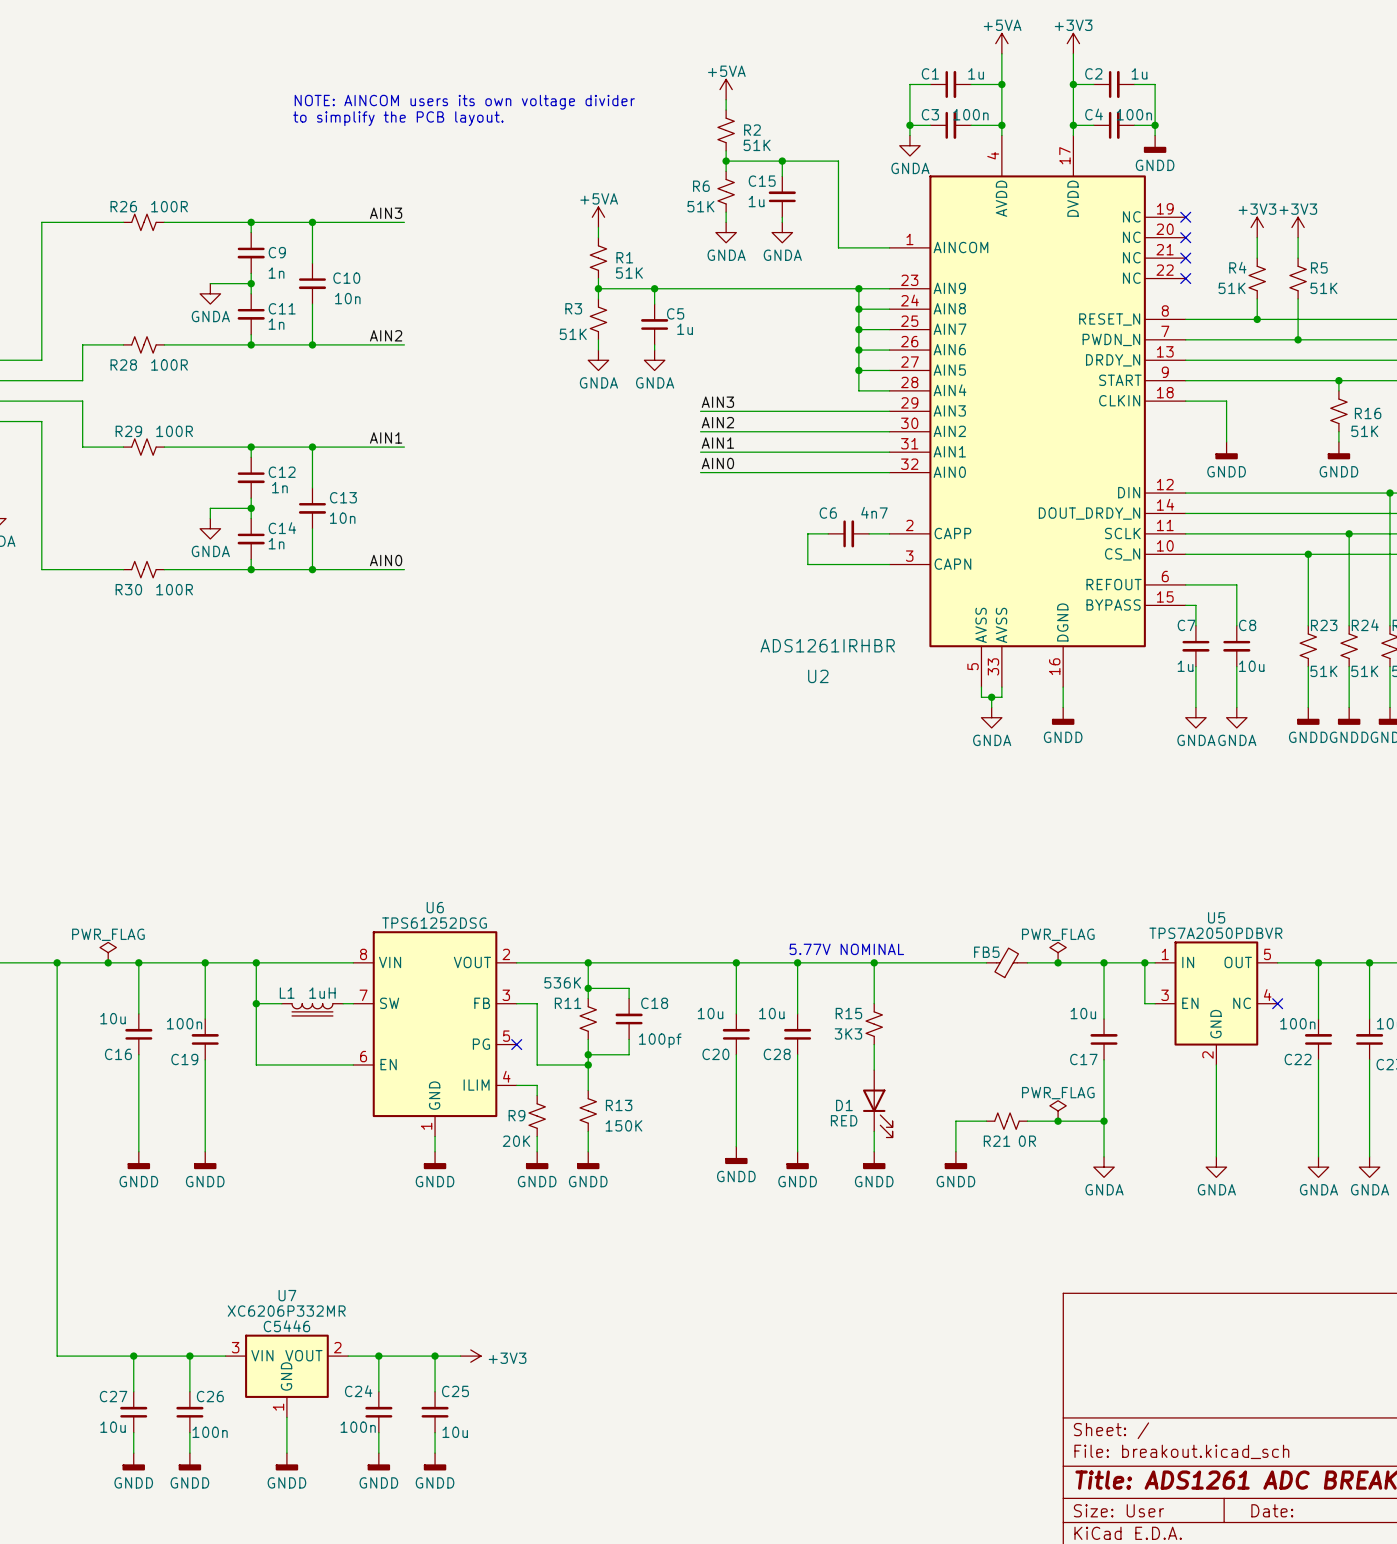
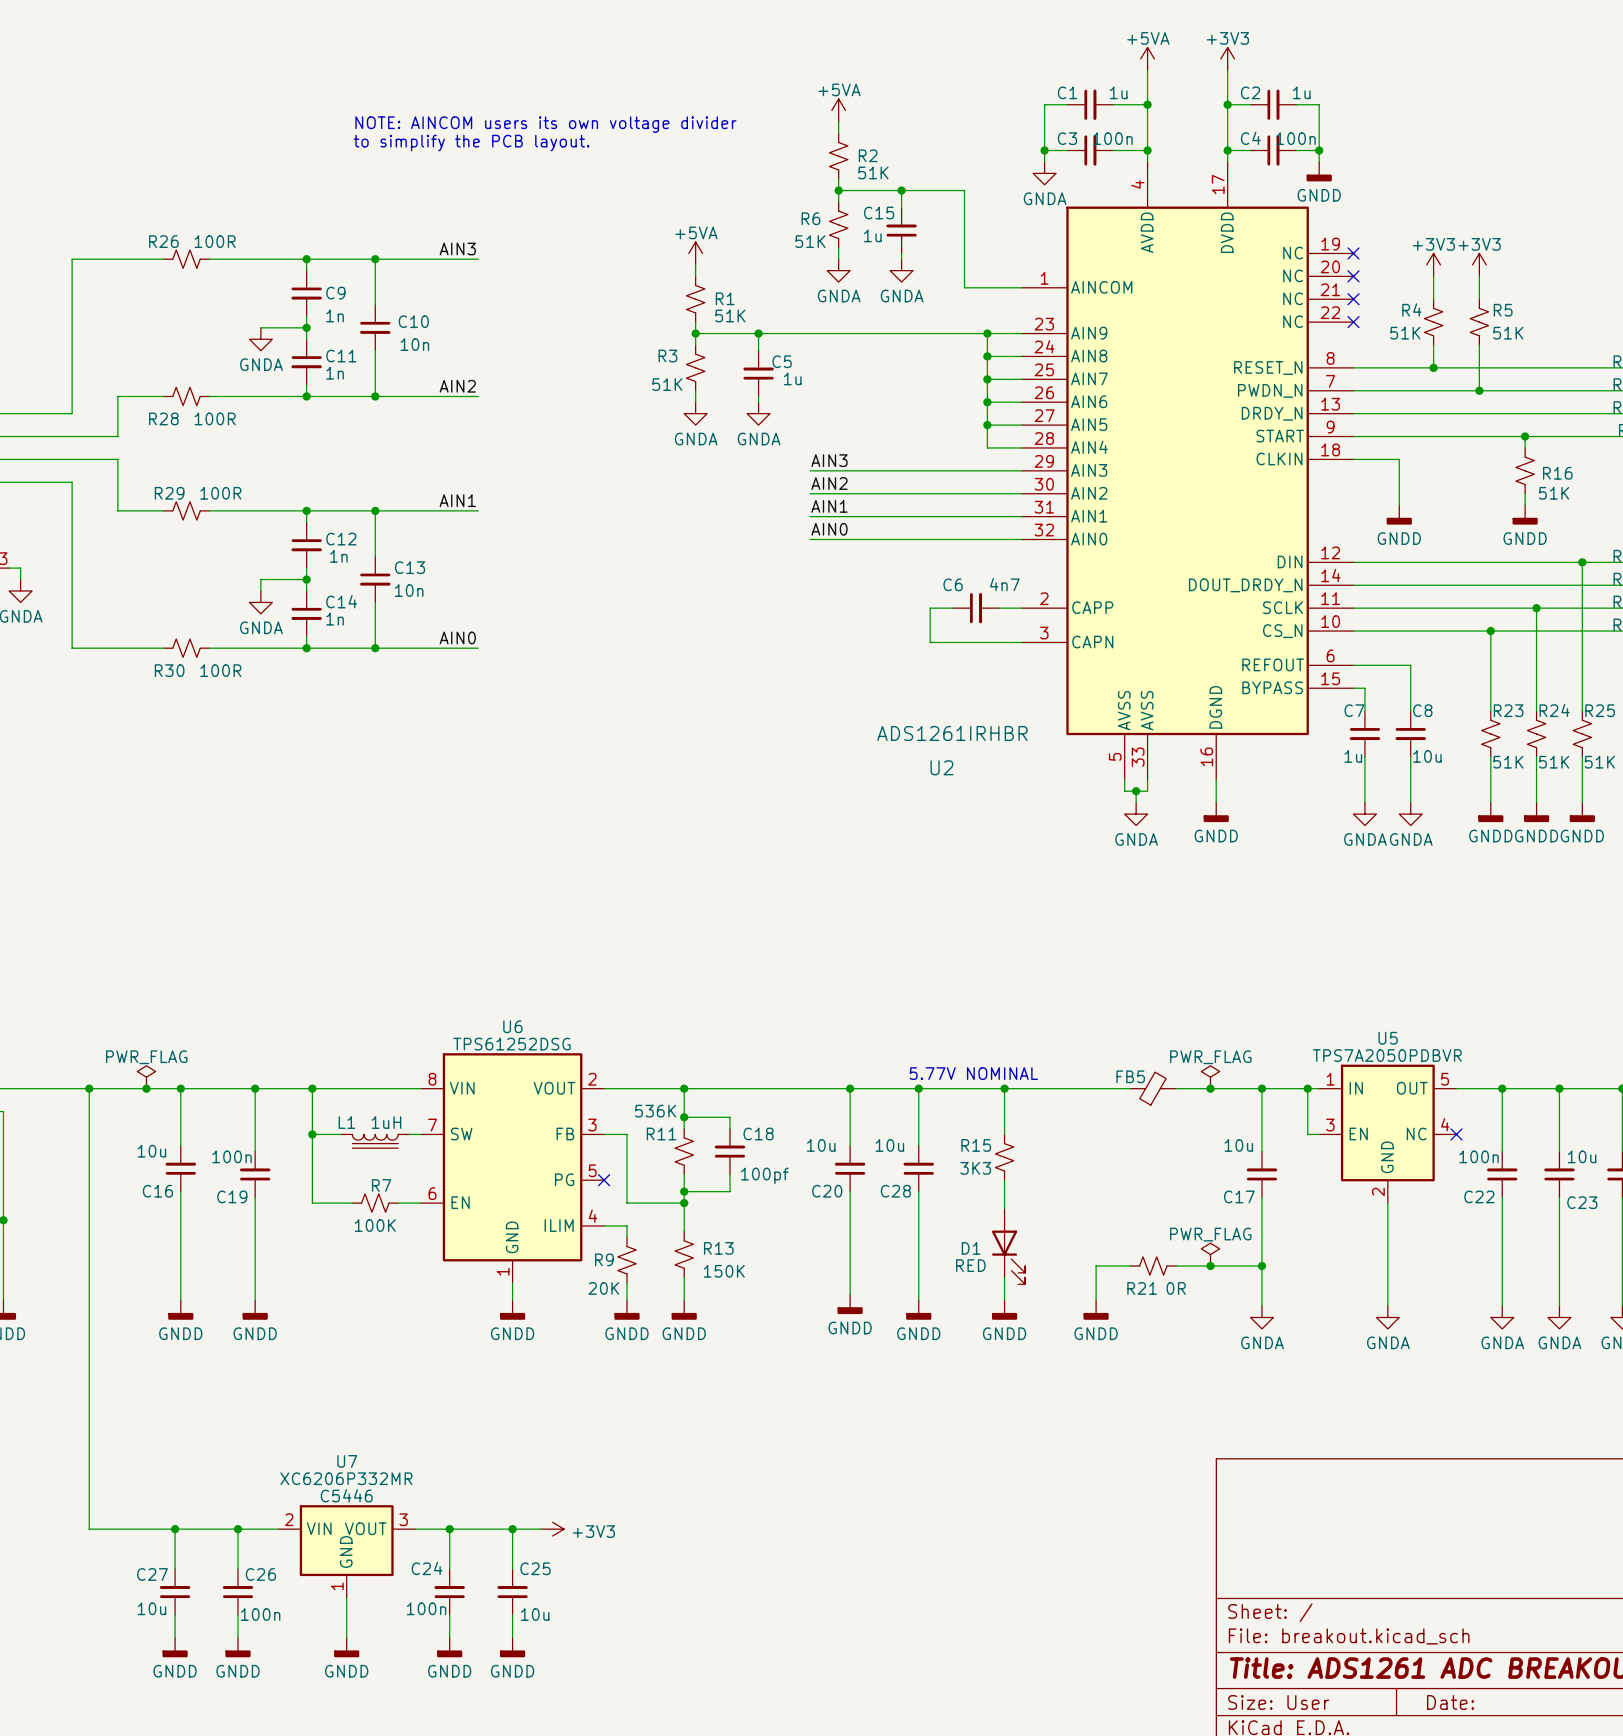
R7: none -> 100K (375, 1203)
U7 pin number: 3 (235, 1347) -> 2 (289, 1519)
U7 pin number: 2 (337, 1347) -> 3 (403, 1519)

